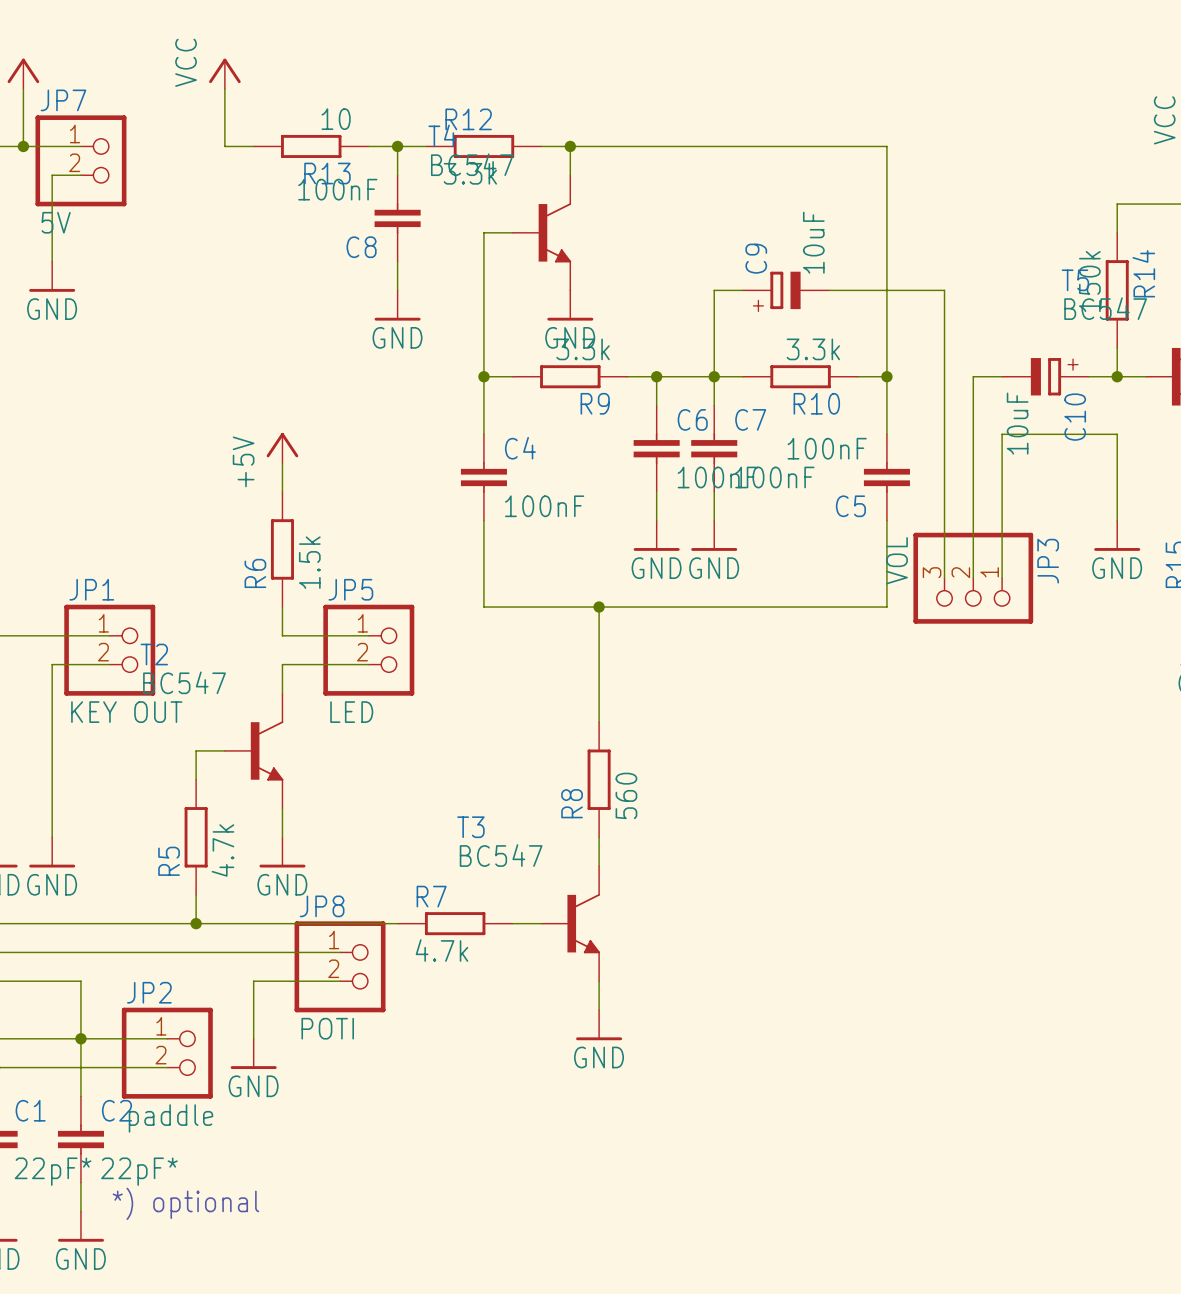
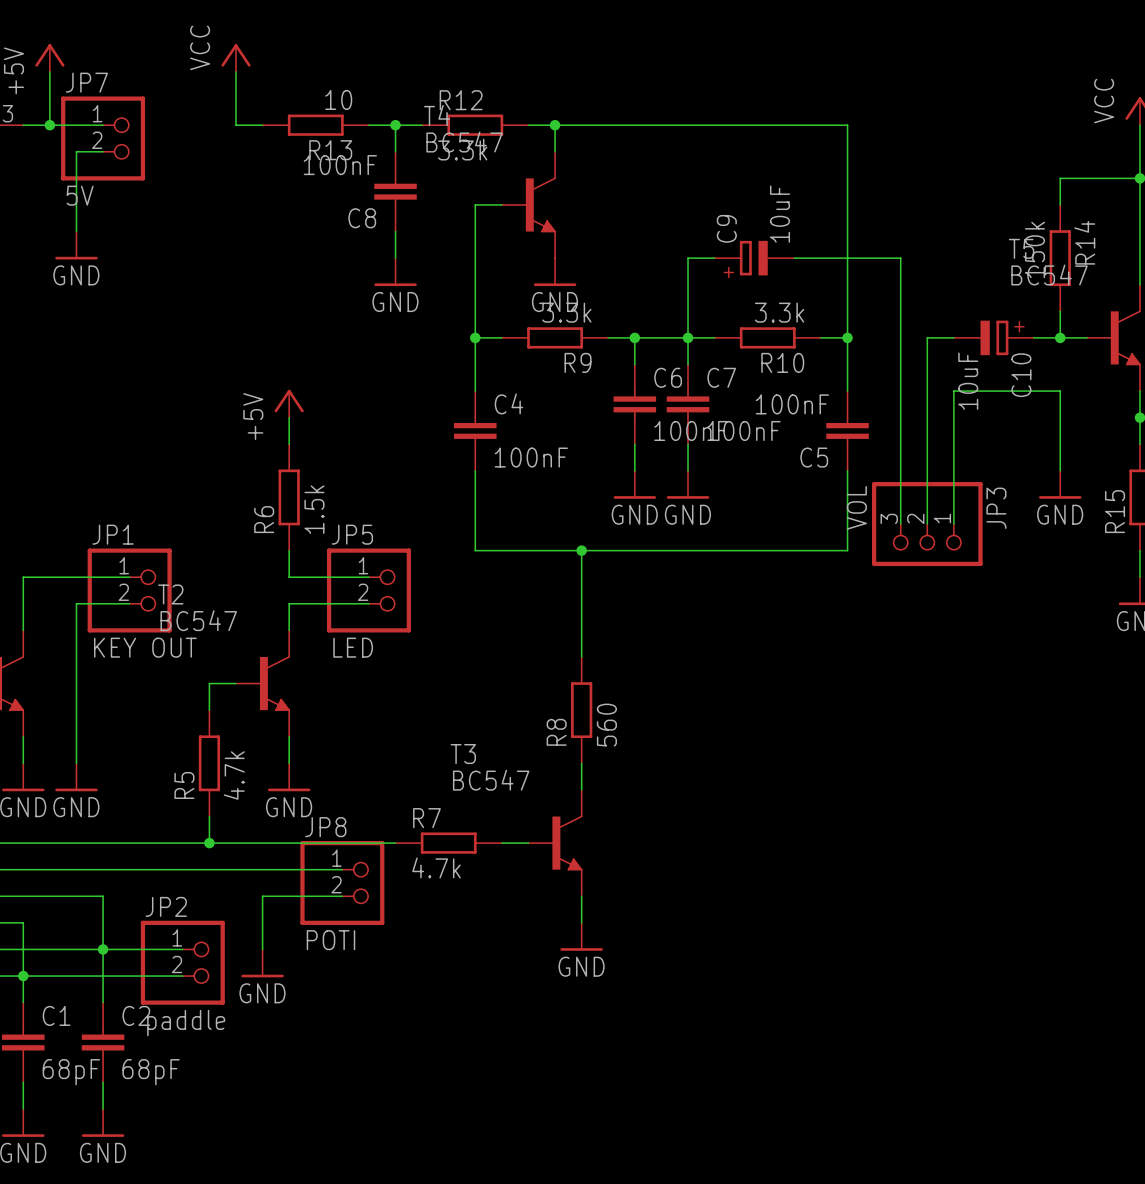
C1 value: 22pF* (53, 1171) -> 68pF (71, 1072)
C2 value: 22pF* (139, 1171) -> 68pF (151, 1072)
text: *) optional (185, 1203) -> none

